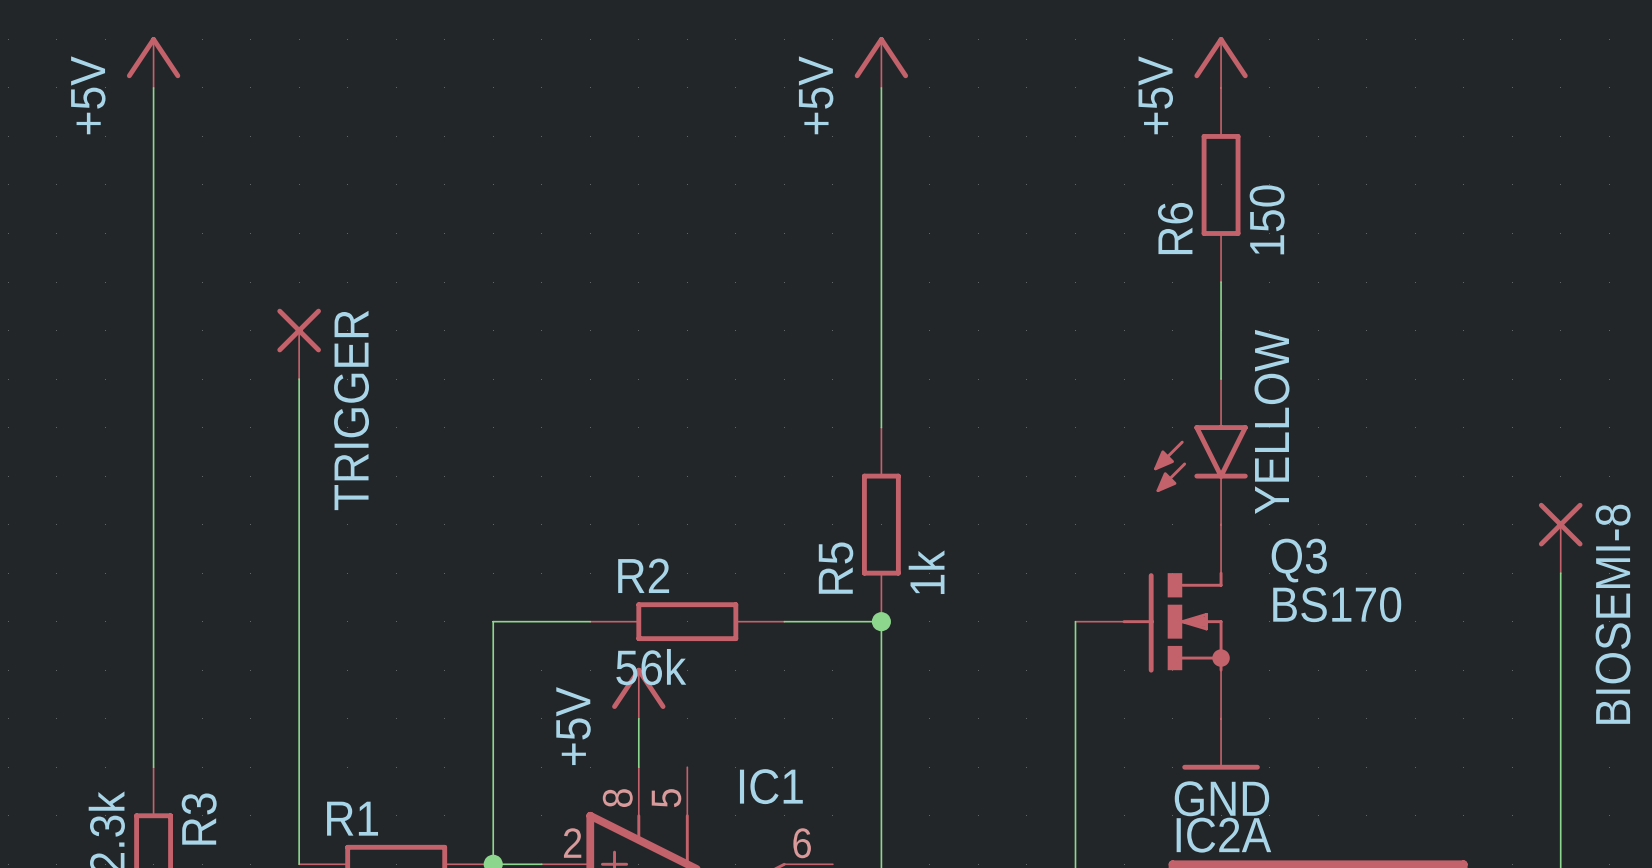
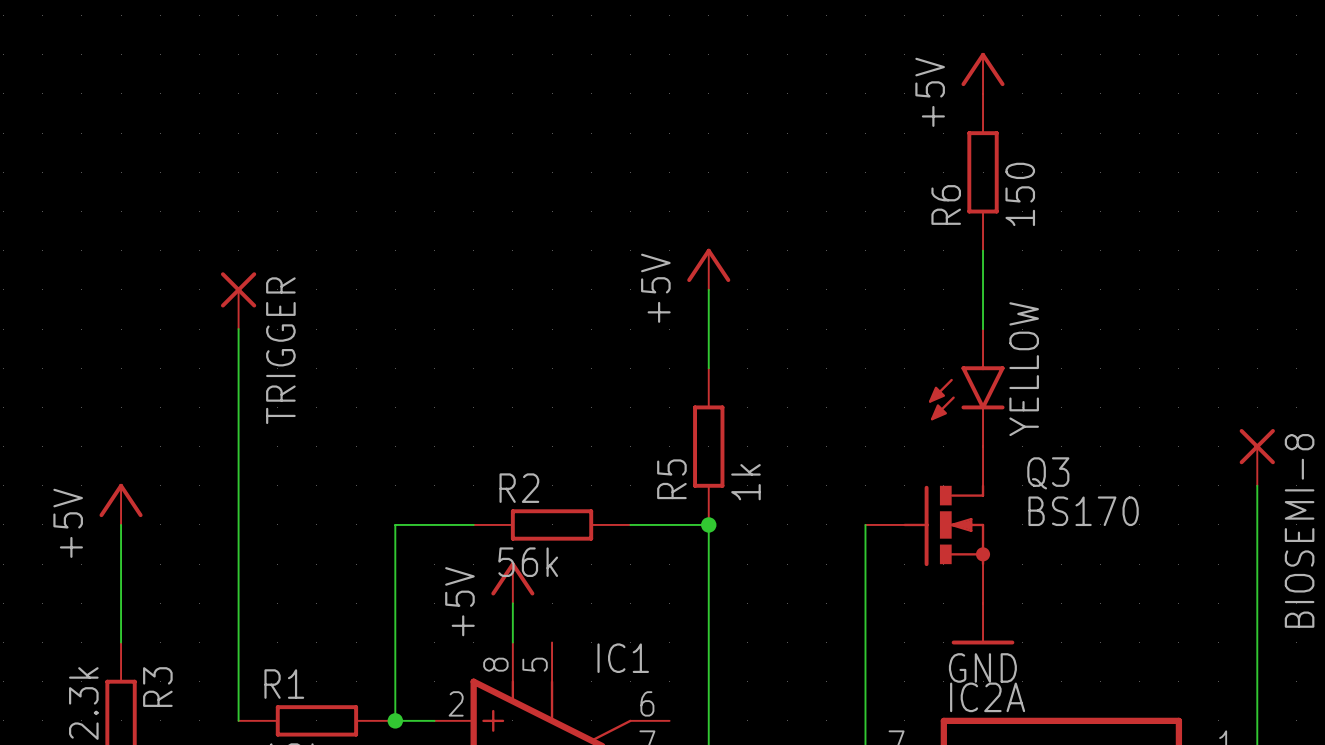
power symbol: +5V (153, 62) -> none
power symbol position: +5V (881, 62) -> +5V (708, 269)
wire: (153, 87) (153, 621) -> none
wire: (881, 87) (881, 330) -> none
power symbol: none -> +5V (121, 504)

